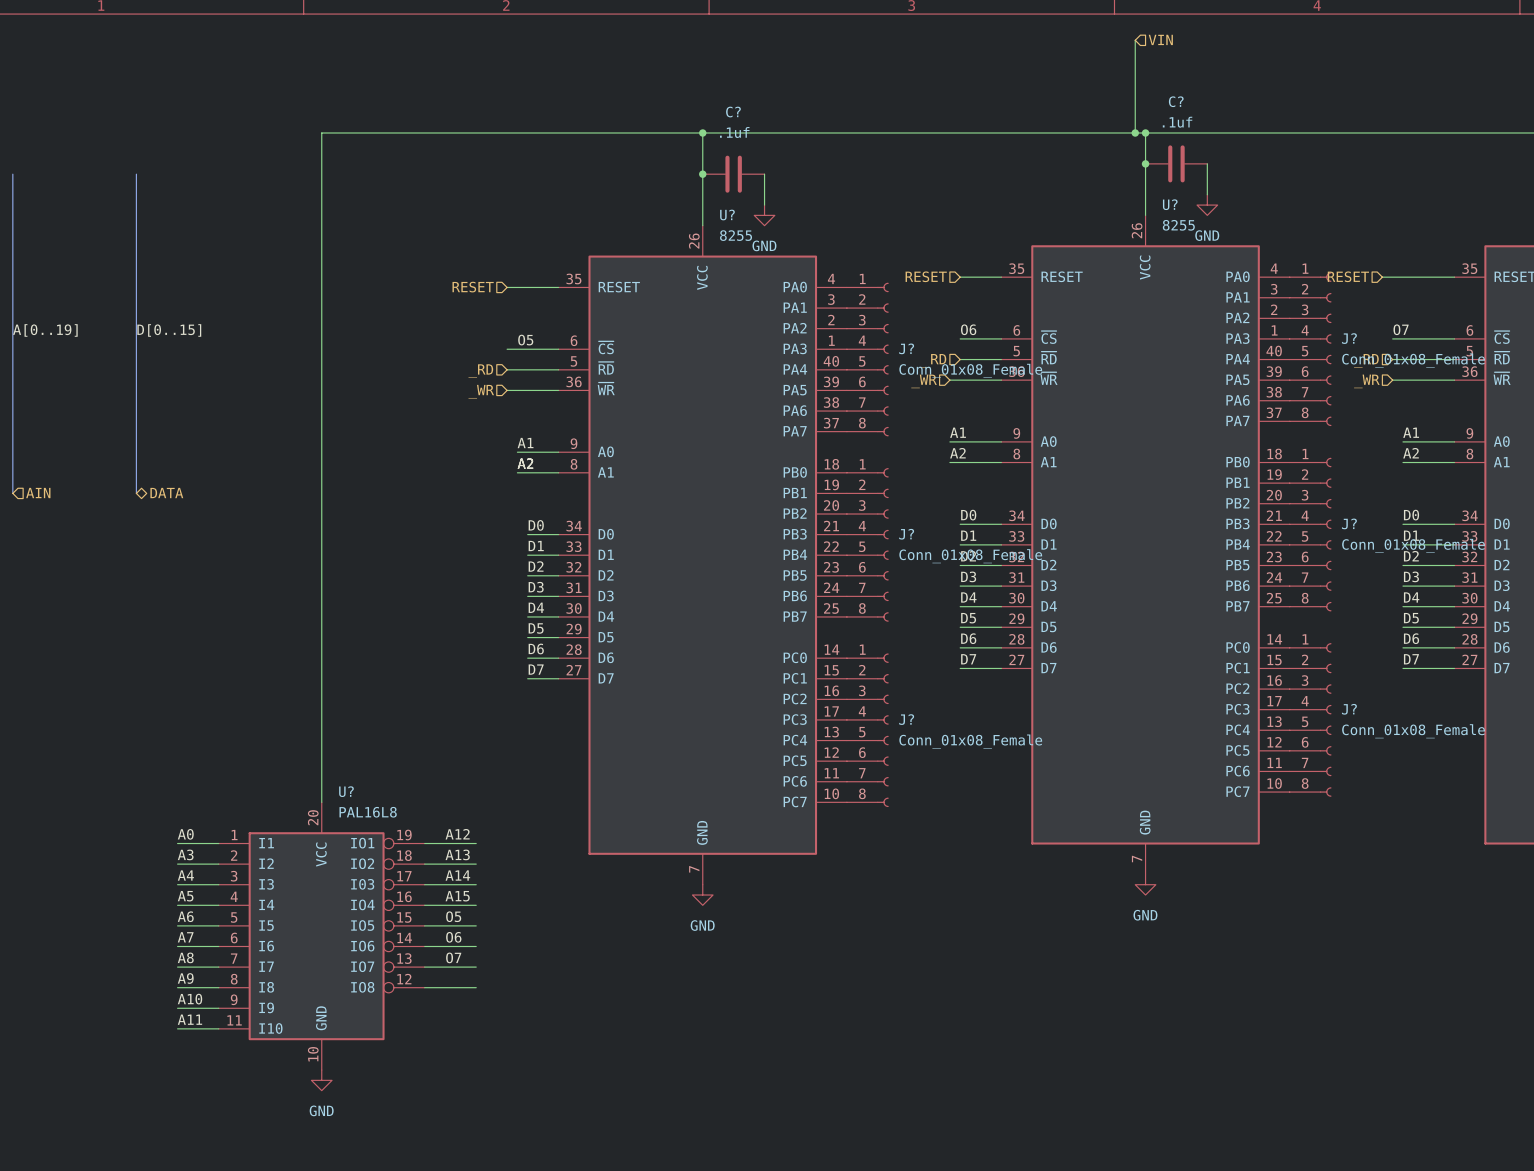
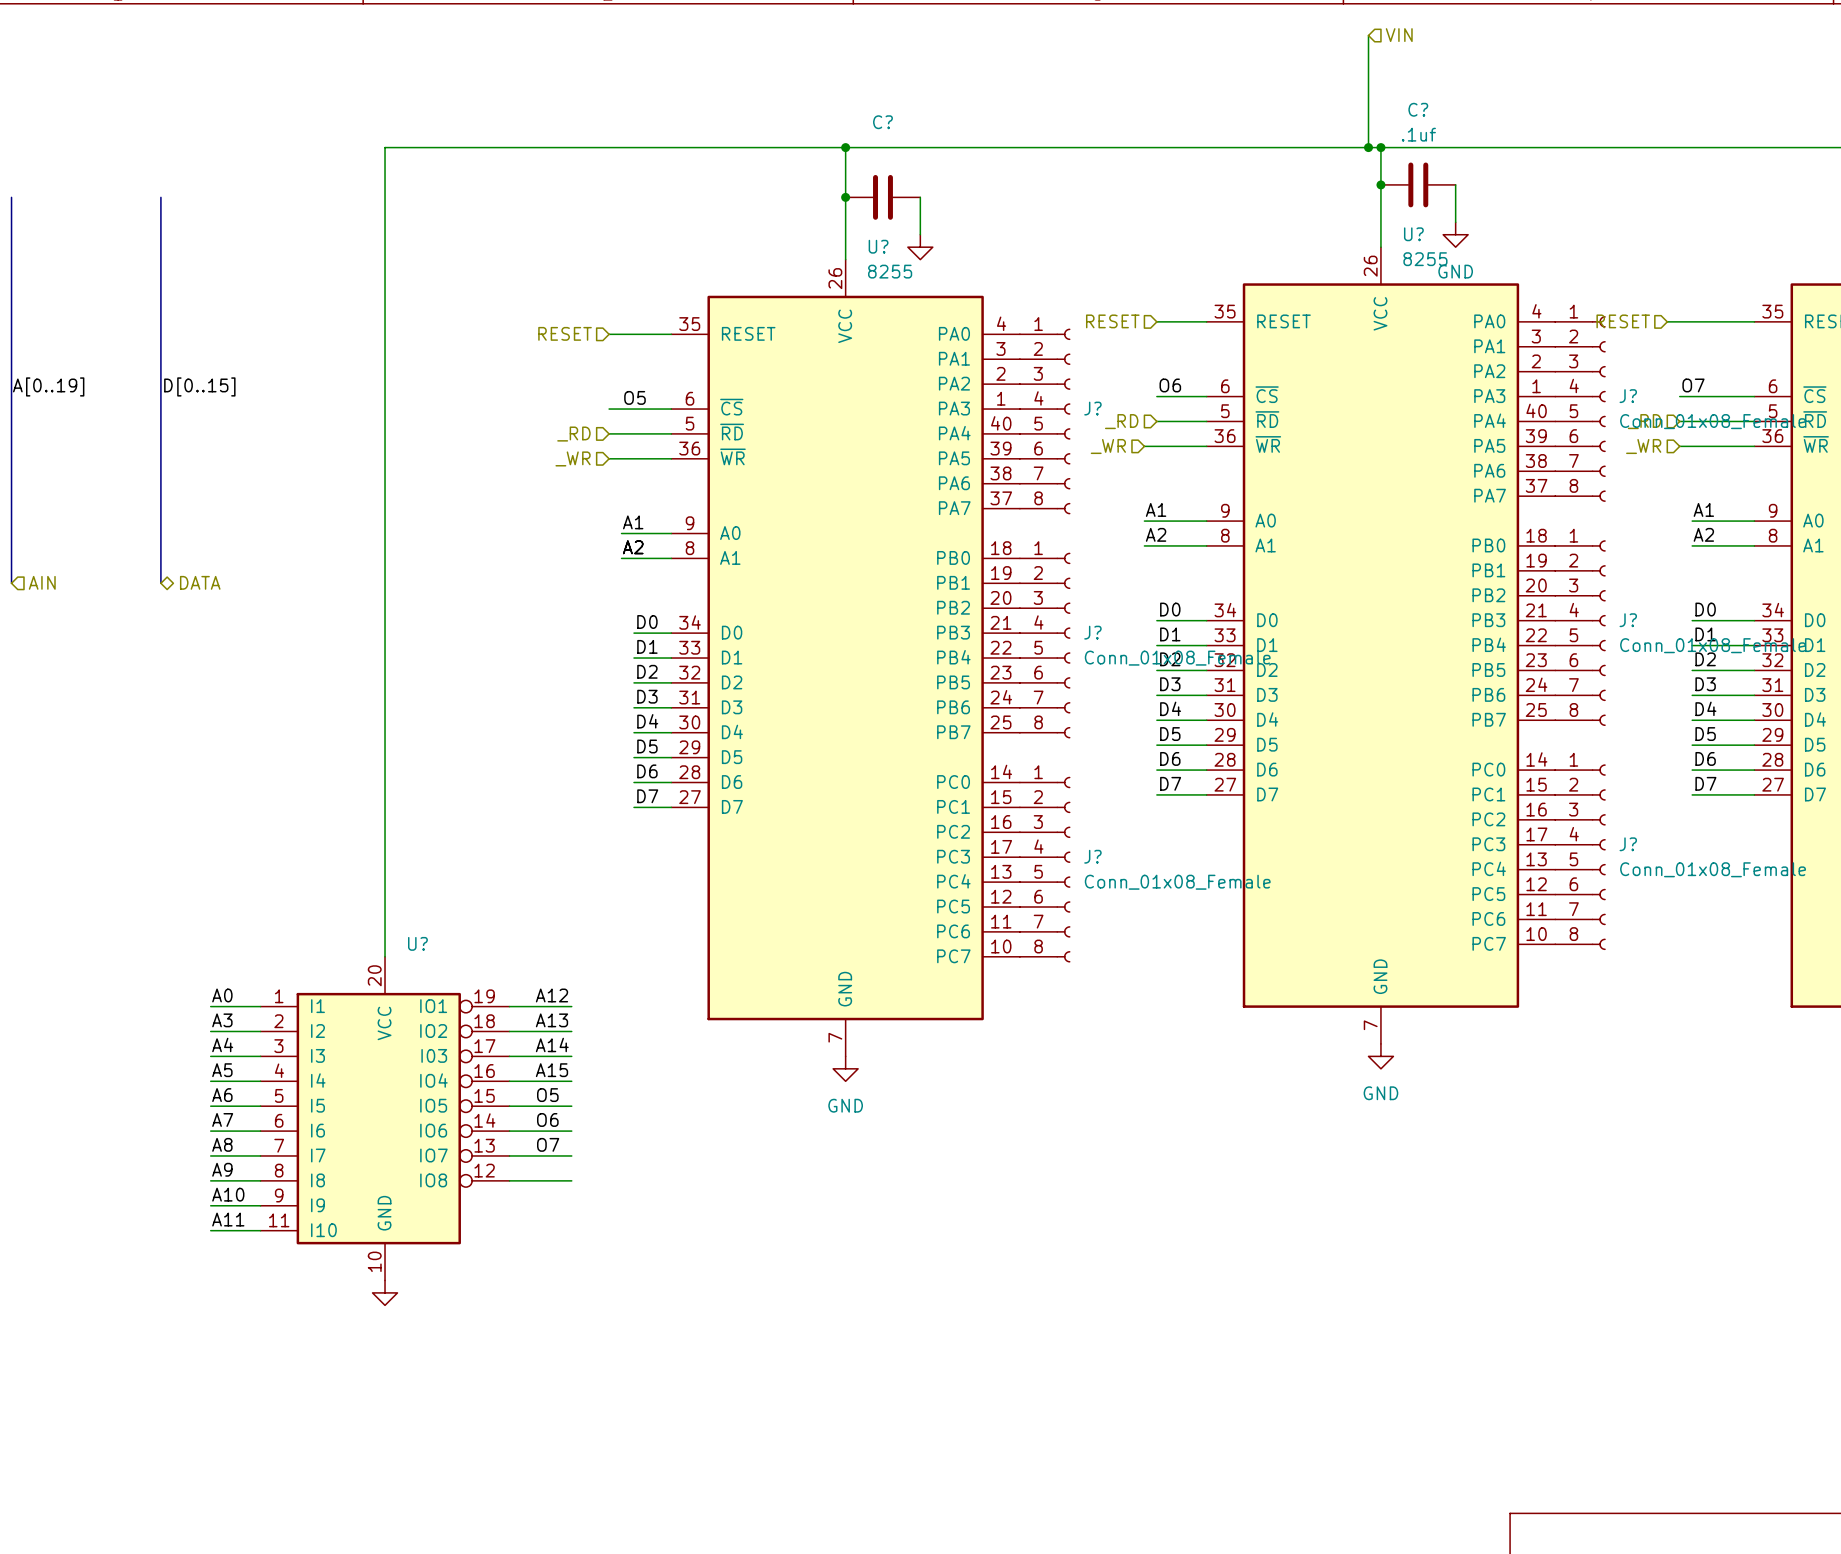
C? value: .1uf (734, 132) -> none
power symbol text: GND (764, 245) -> none
J? value: Conn_01x08_Female (970, 370) -> none
U? value: PAL16L8 (368, 812) -> none
power symbol text: GND (321, 1110) -> none

